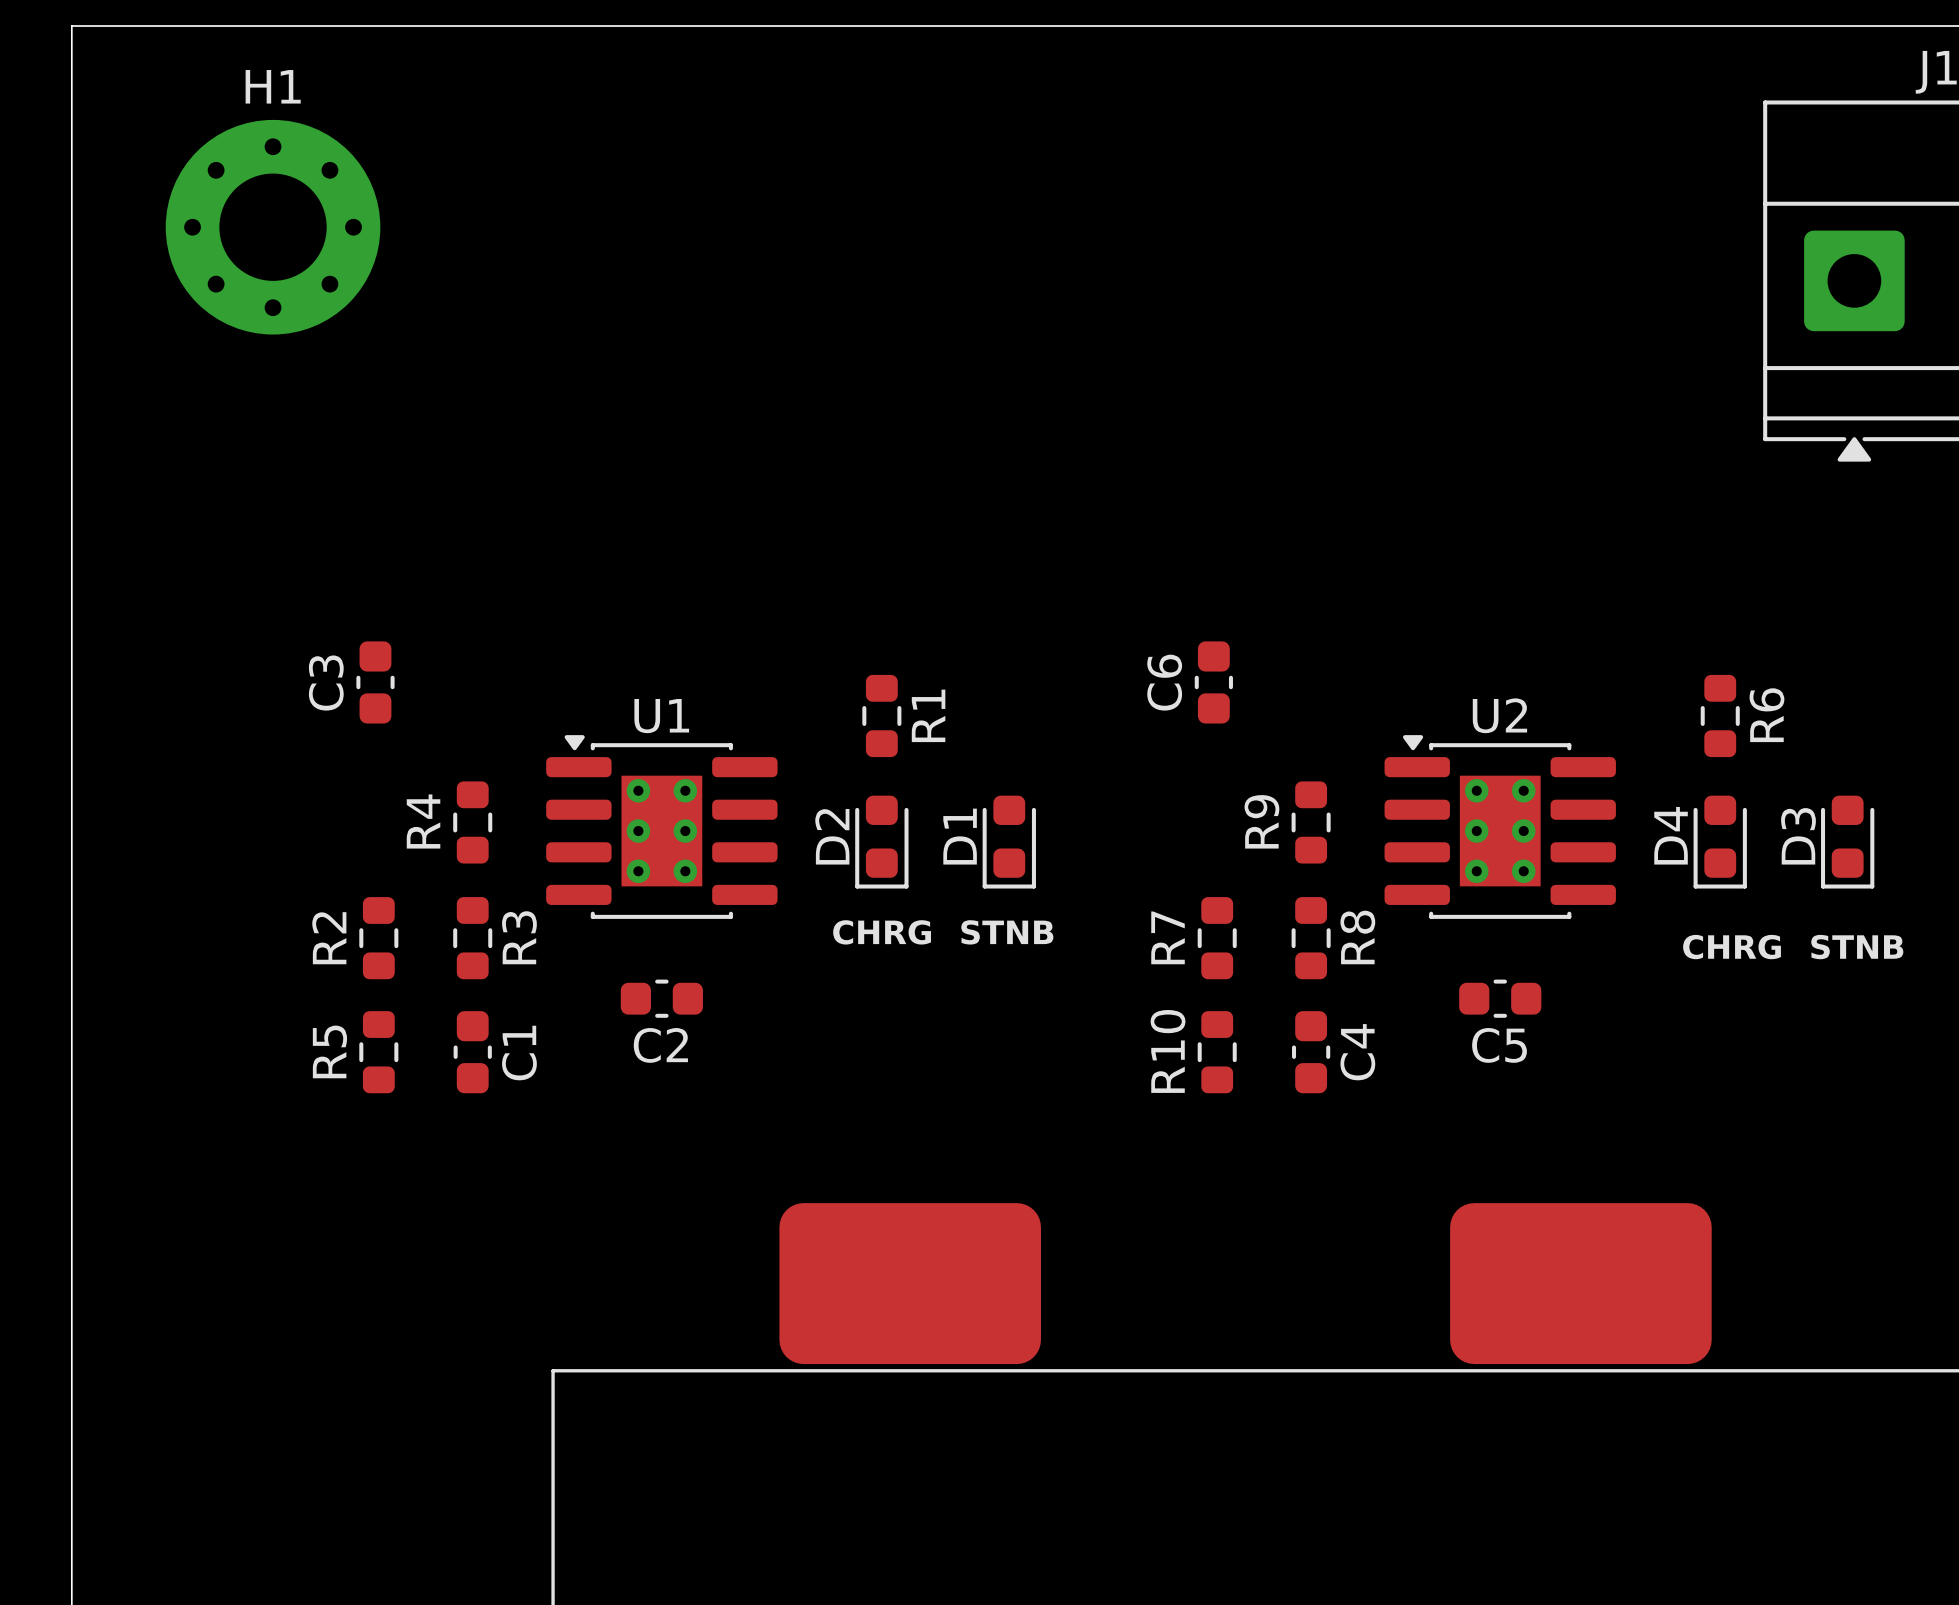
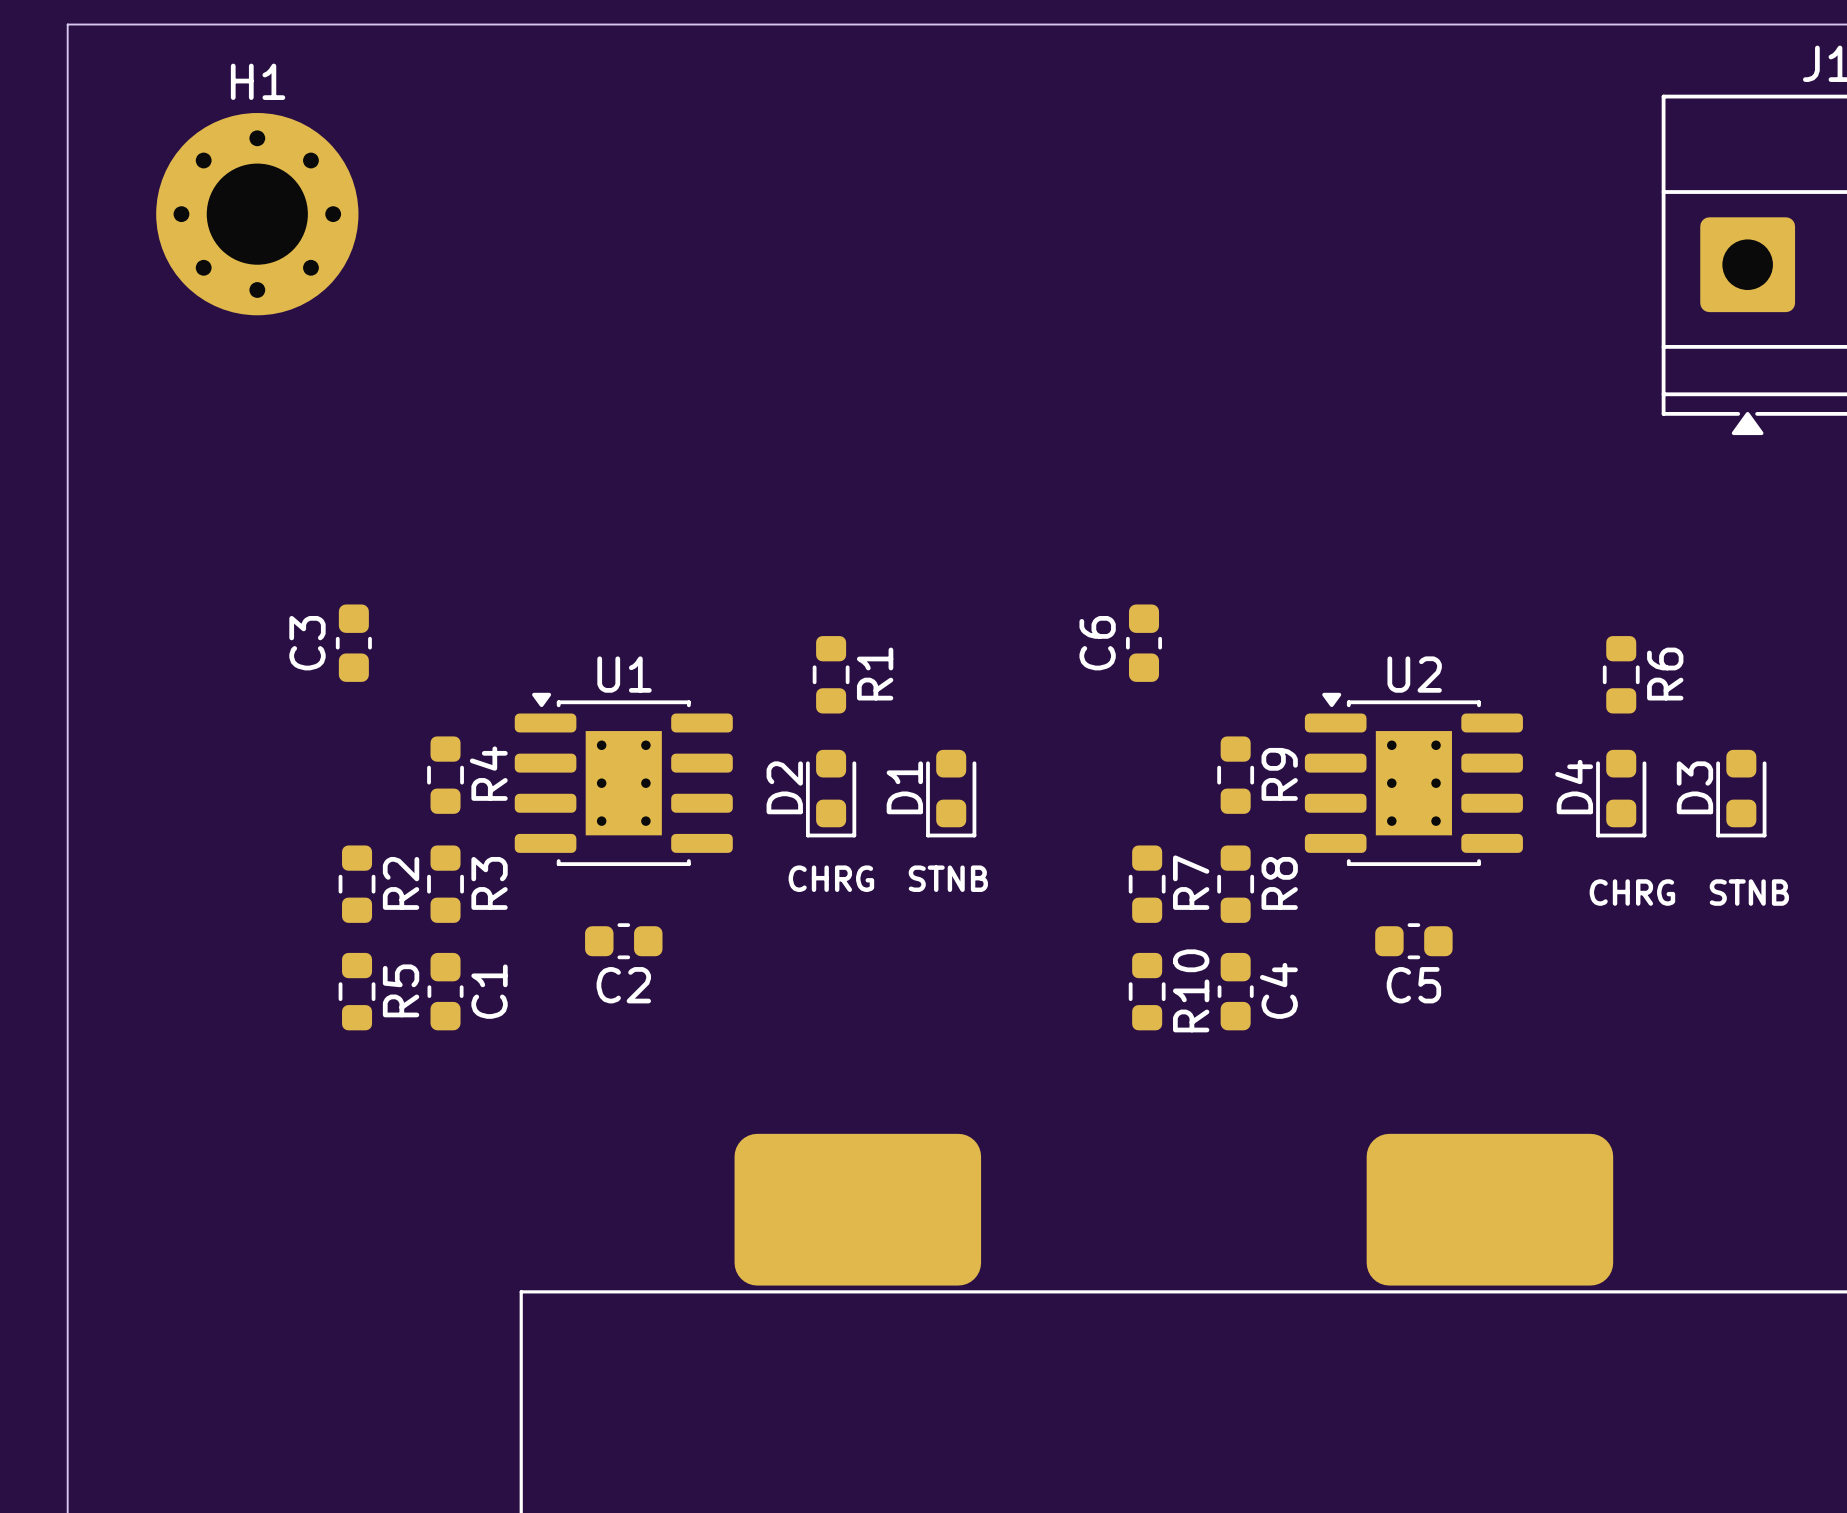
R4 name position: R4 (423, 821) -> R4 (488, 773)
R9 name position: R9 (1261, 821) -> R9 (1279, 774)
R7 name position: R7 (1168, 937) -> R7 (1191, 882)
R2 name position: R2 (329, 938) -> R2 (401, 883)
R5 name position: R5 (329, 1051) -> R5 (401, 990)
R10 name position: R10 (1168, 1051) -> R10 (1191, 990)

